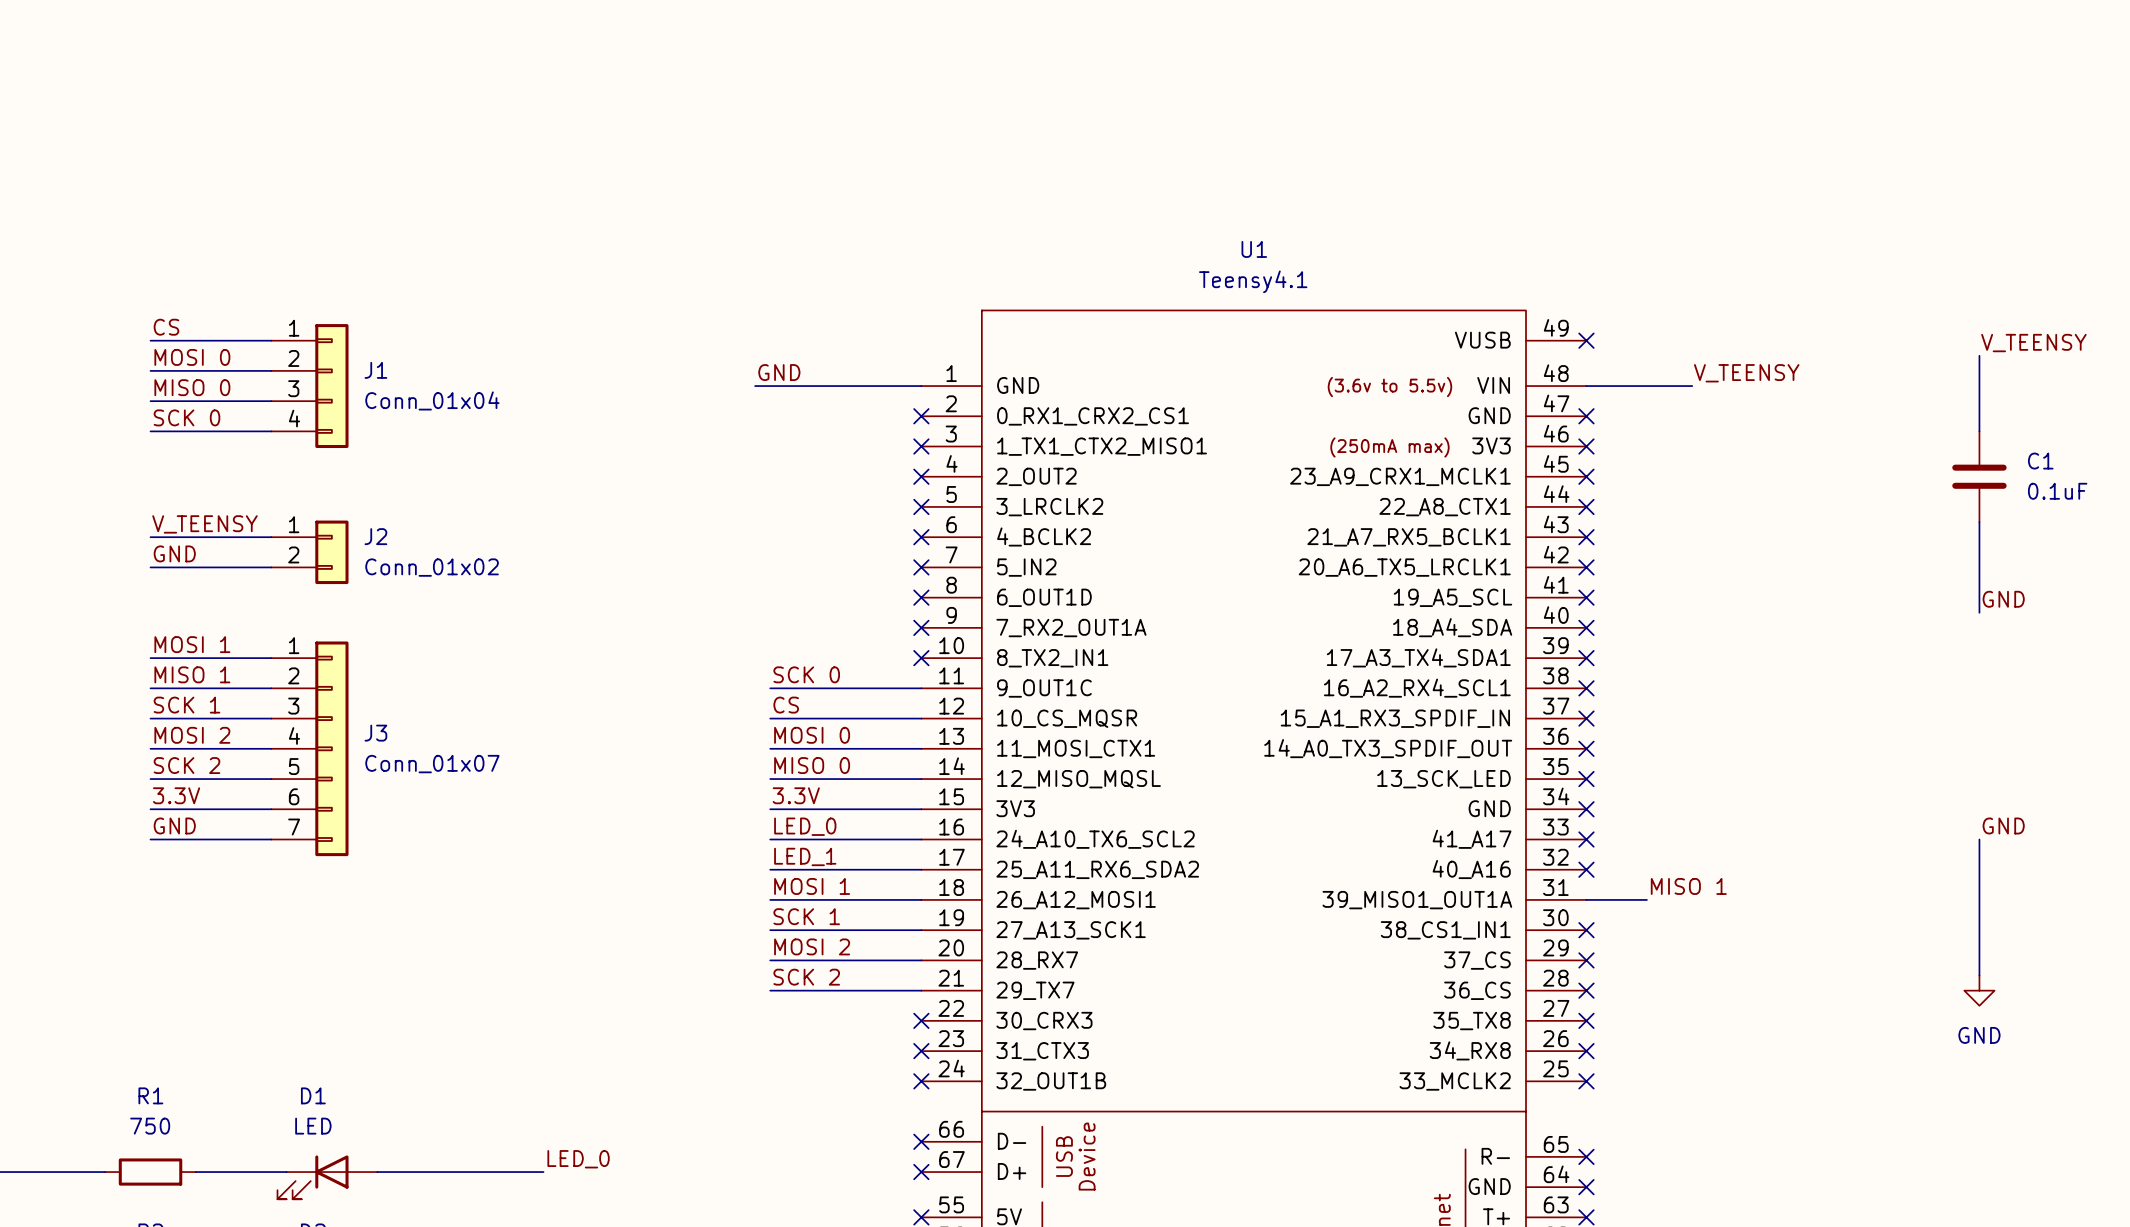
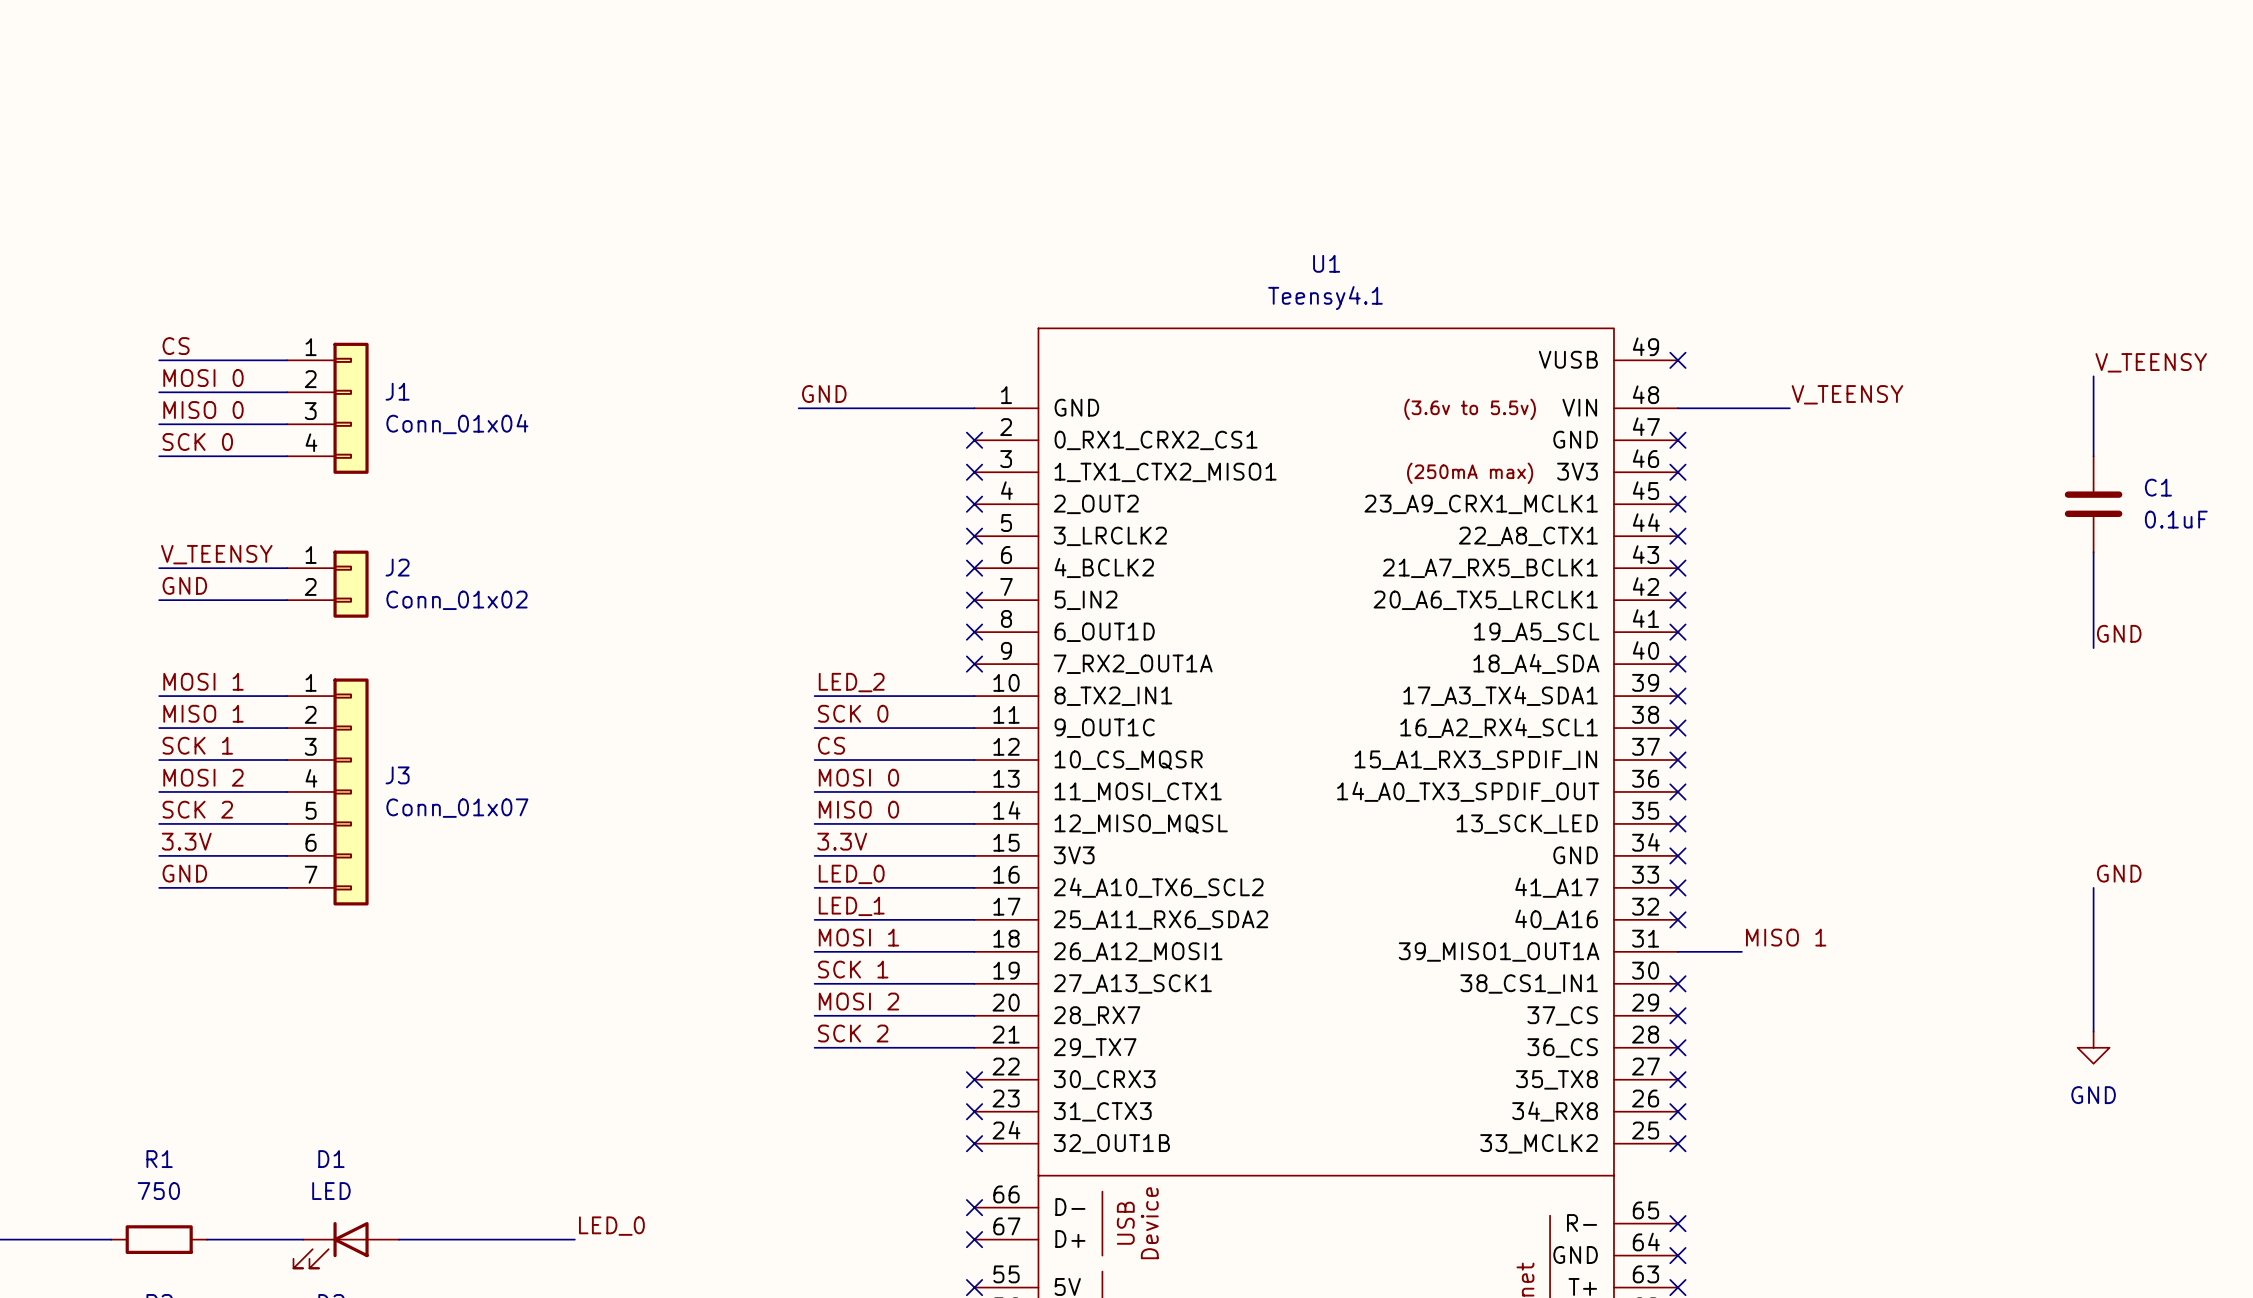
label: none -> LED_2 (851, 682)
wire: none -> (814, 696) (974, 696)
no-connect mark: (921, 658) -> none

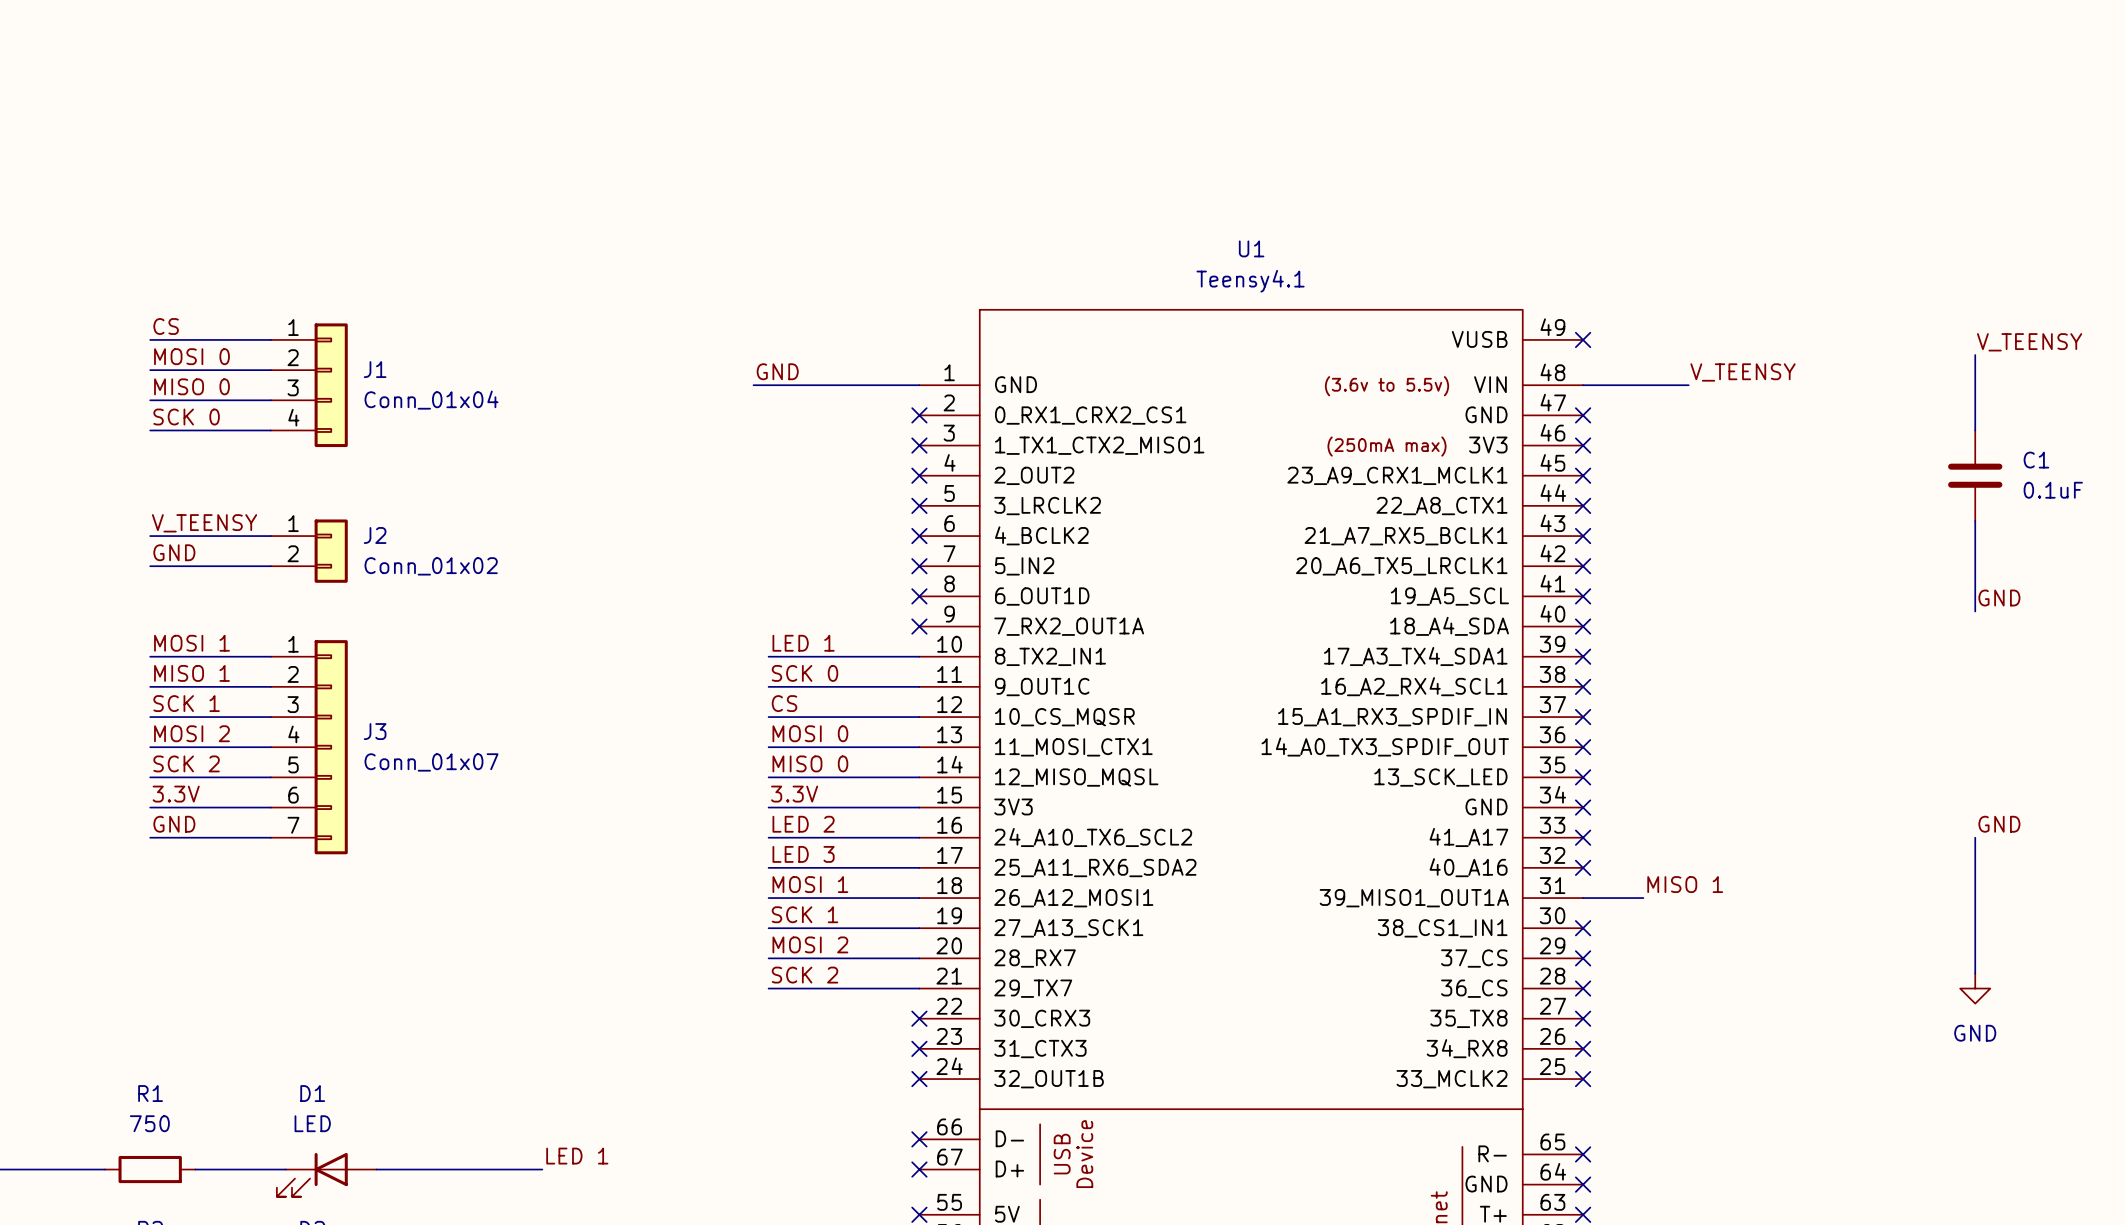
label: LED_2 (851, 682) -> LED 1 (803, 643)
label: LED_0 (851, 874) -> LED 2 (803, 824)
label: LED_1 (851, 906) -> LED 3 (803, 854)
label: LED_0 (611, 1226) -> LED 1 (577, 1156)

